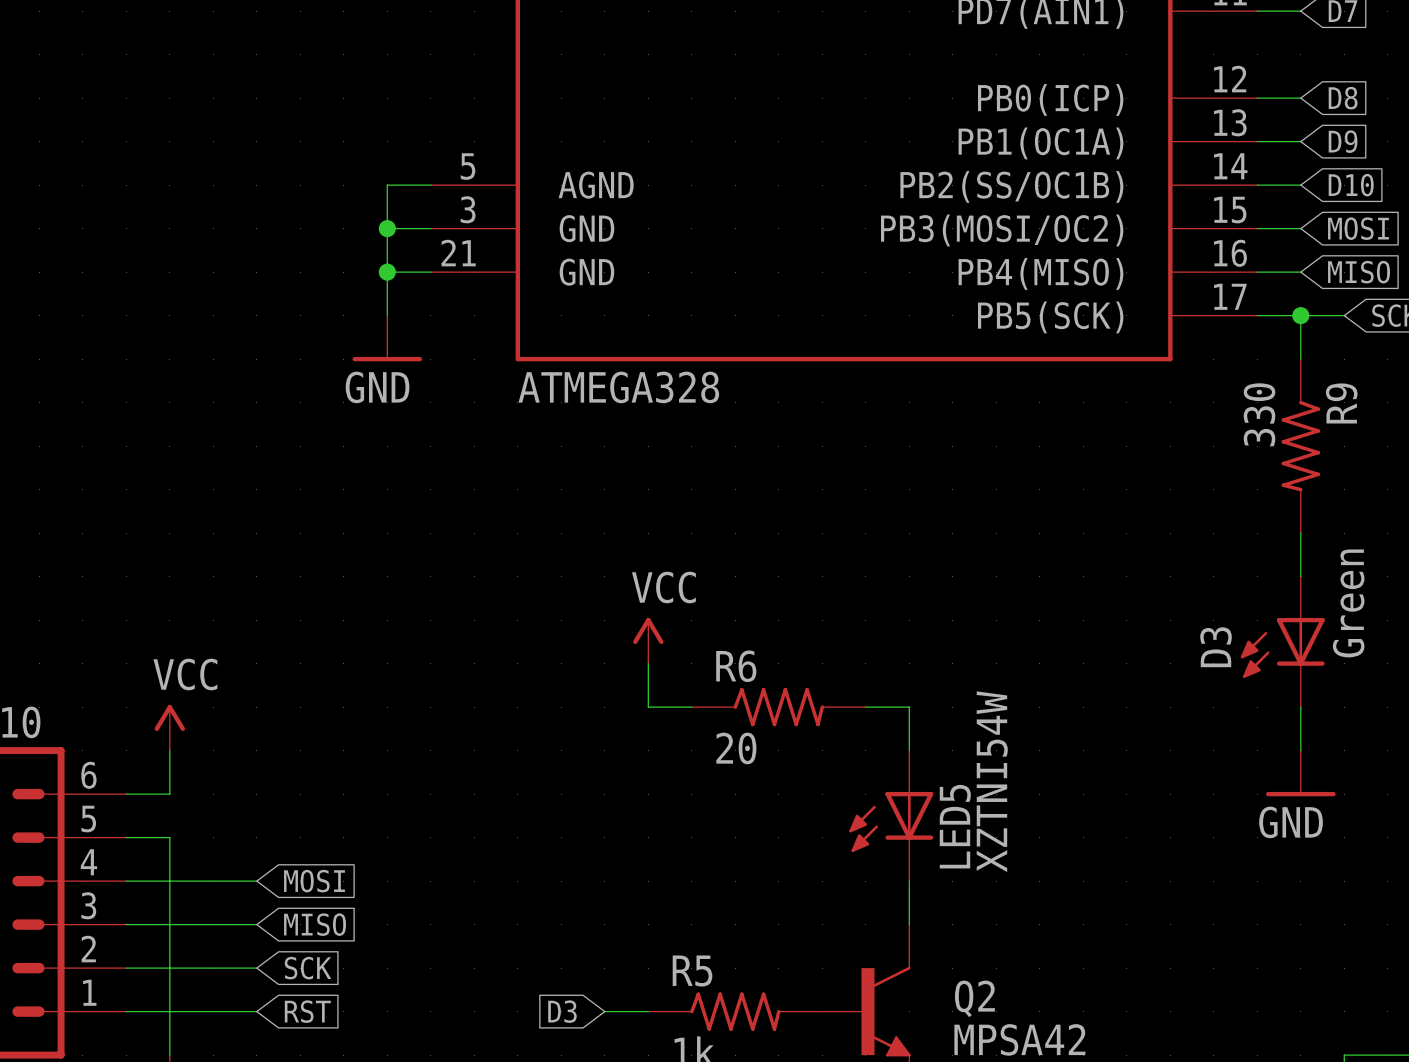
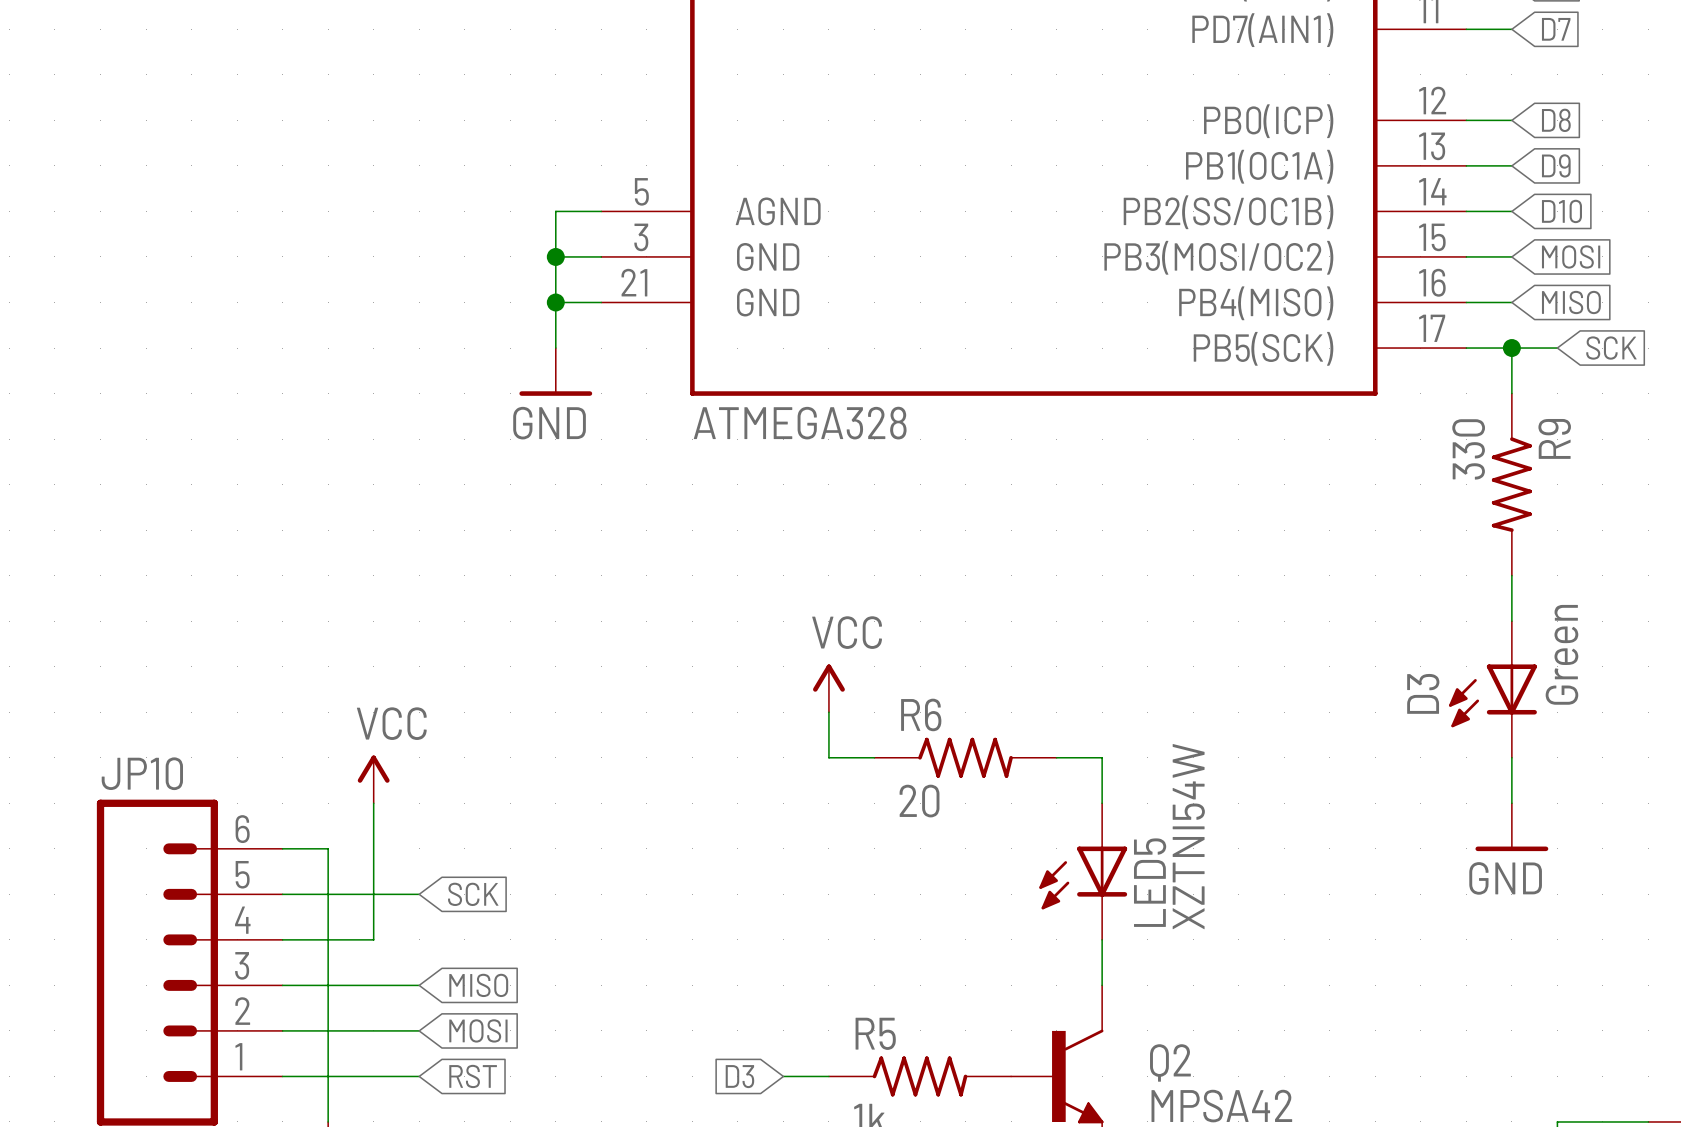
power symbol position: VCC (169, 727) -> VCC (373, 779)
wire: (169, 750) (169, 794) -> (419, 894) (328, 894) (328, 848)
global label: none -> SCK (473, 894)
wire: (213, 881) (256, 881) -> (373, 939) (373, 803)
global label: MOSI (314, 881) -> none
global label: SCK (308, 968) -> MOSI (478, 1030)

